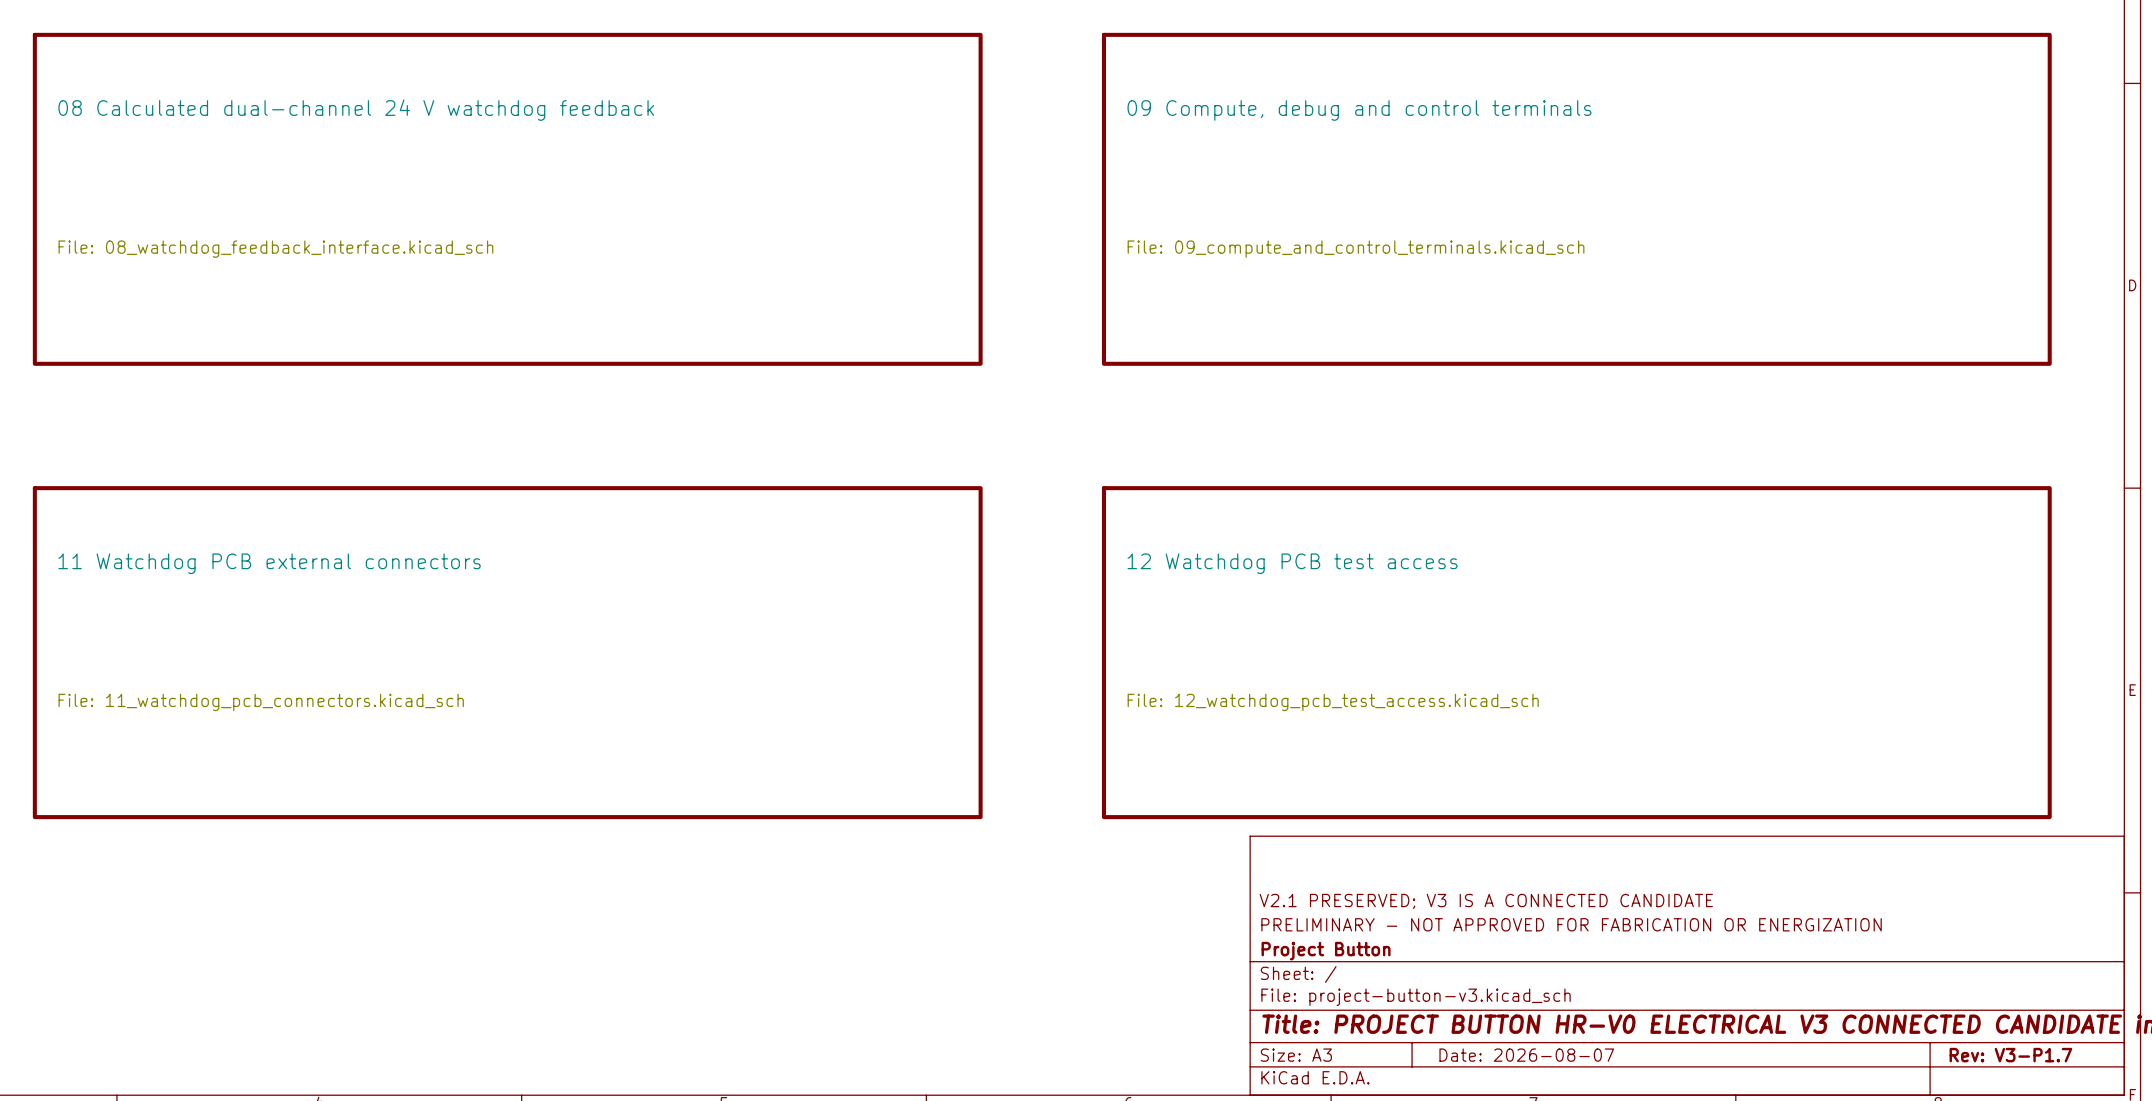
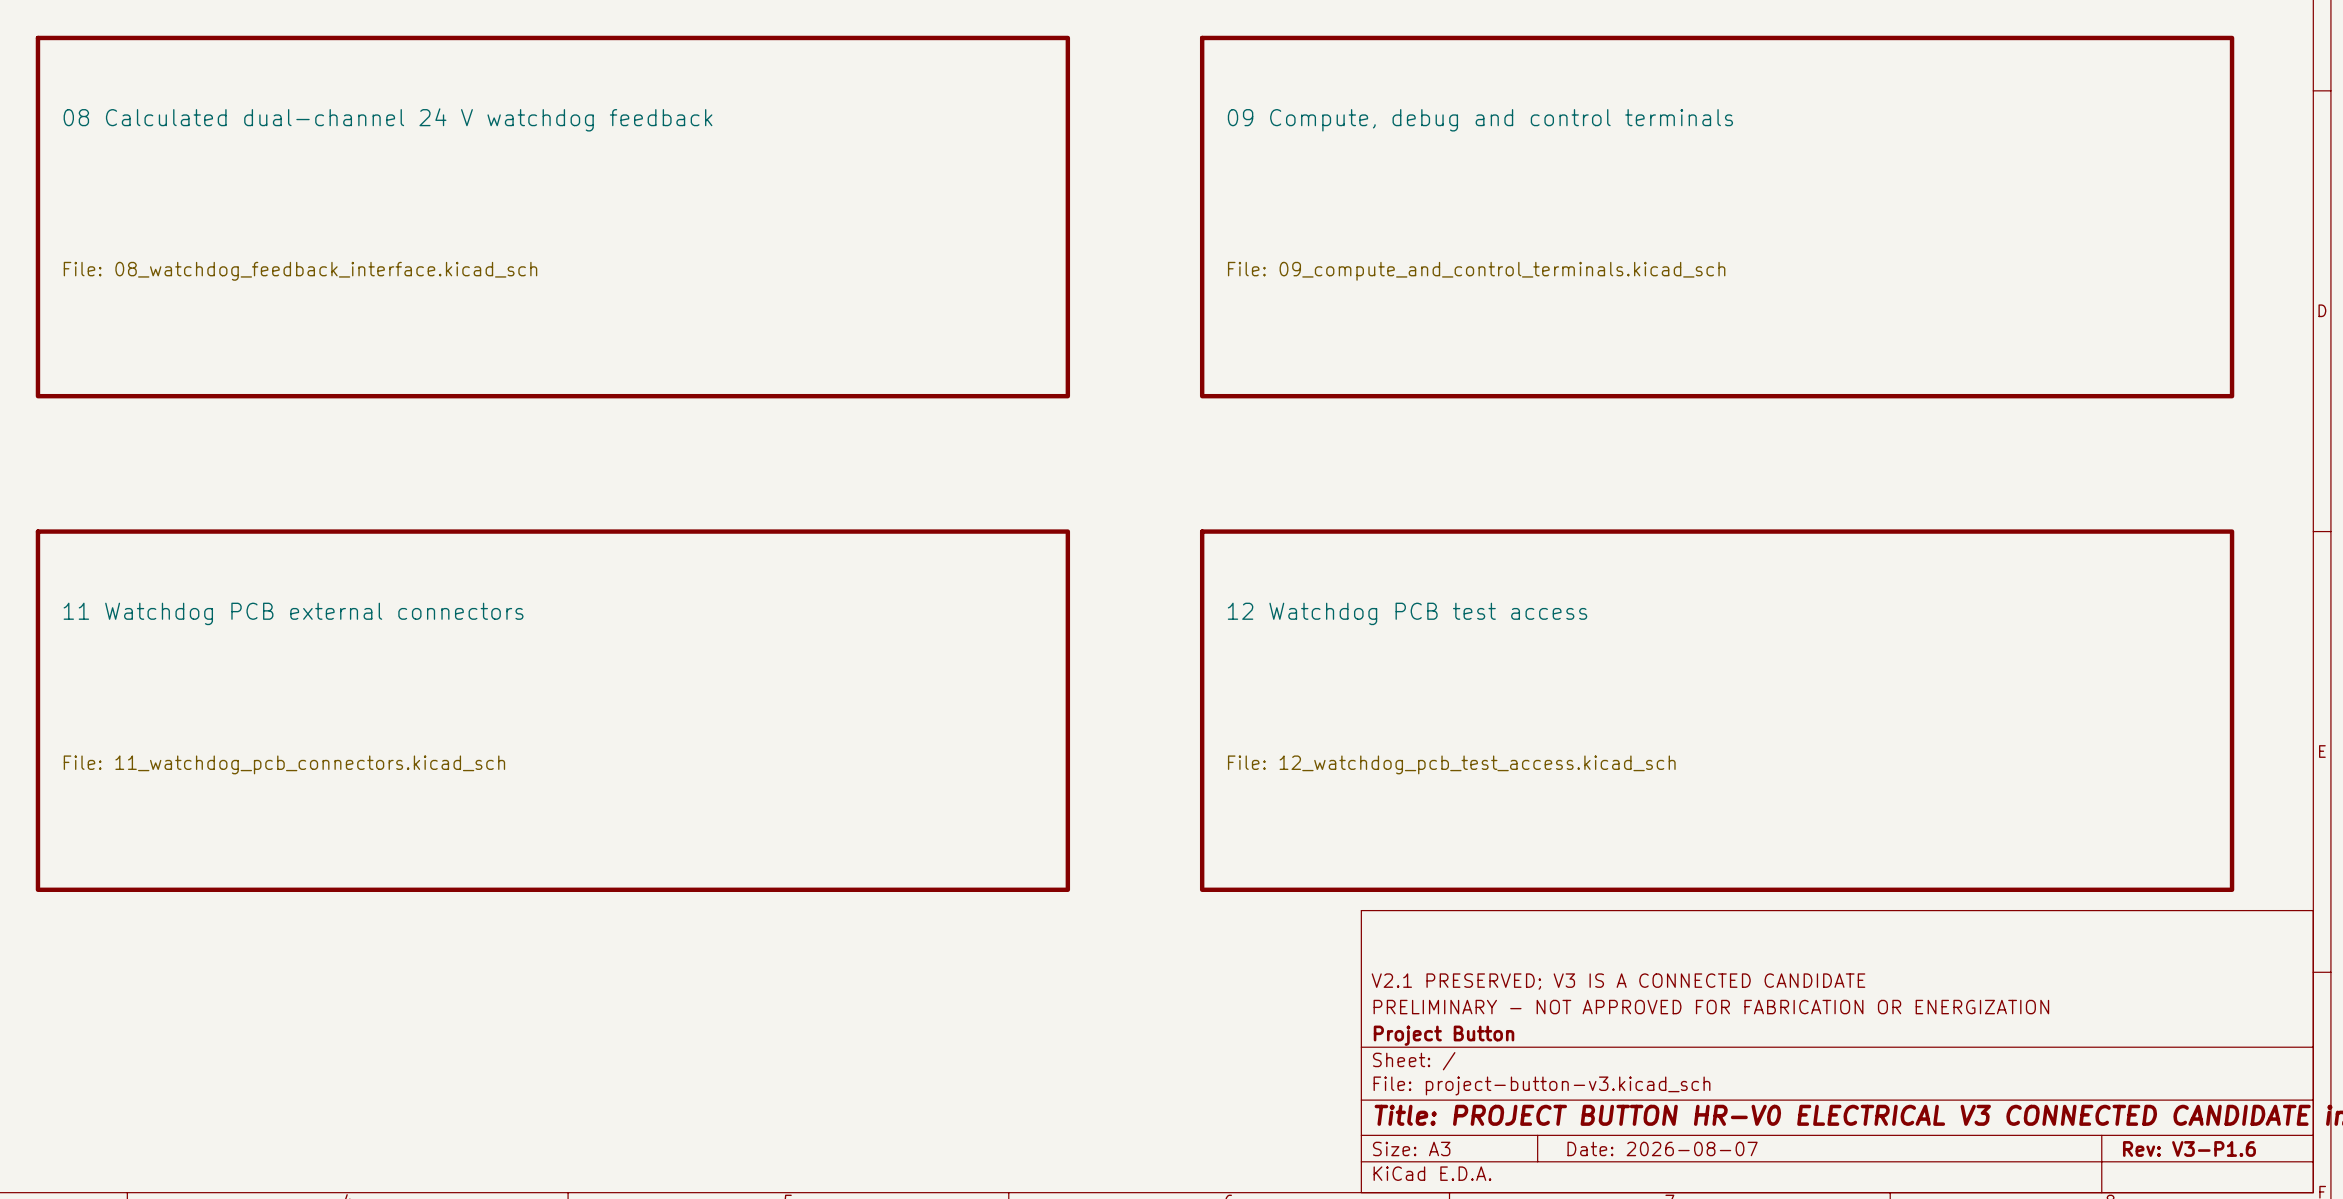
title block: Rev: V3-P1.7 (2010, 1055) -> Rev: V3-P1.6 (2189, 1148)

